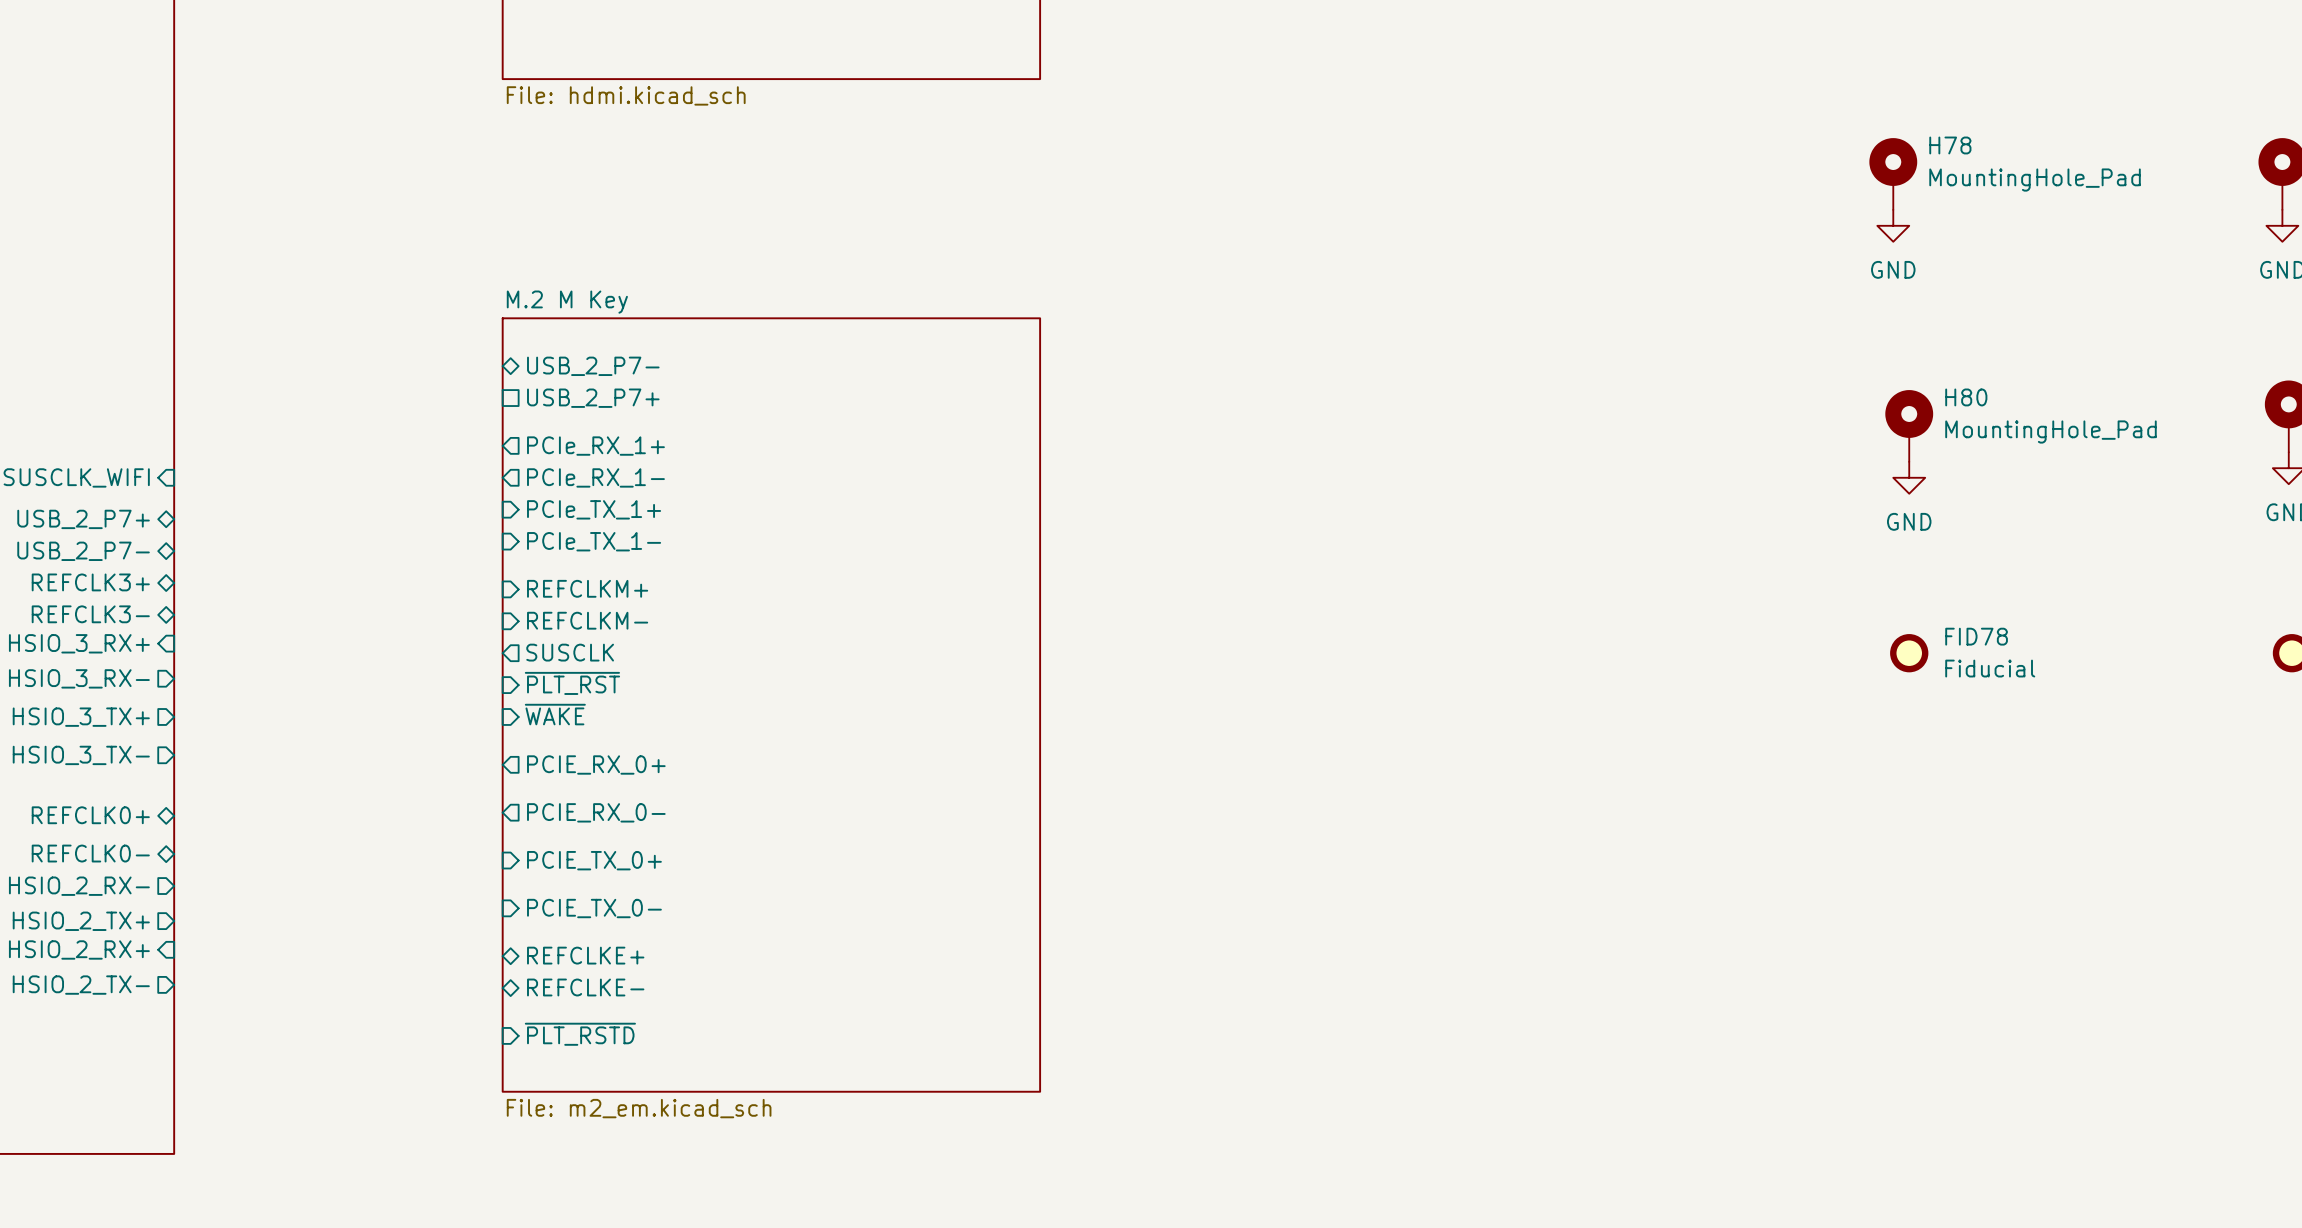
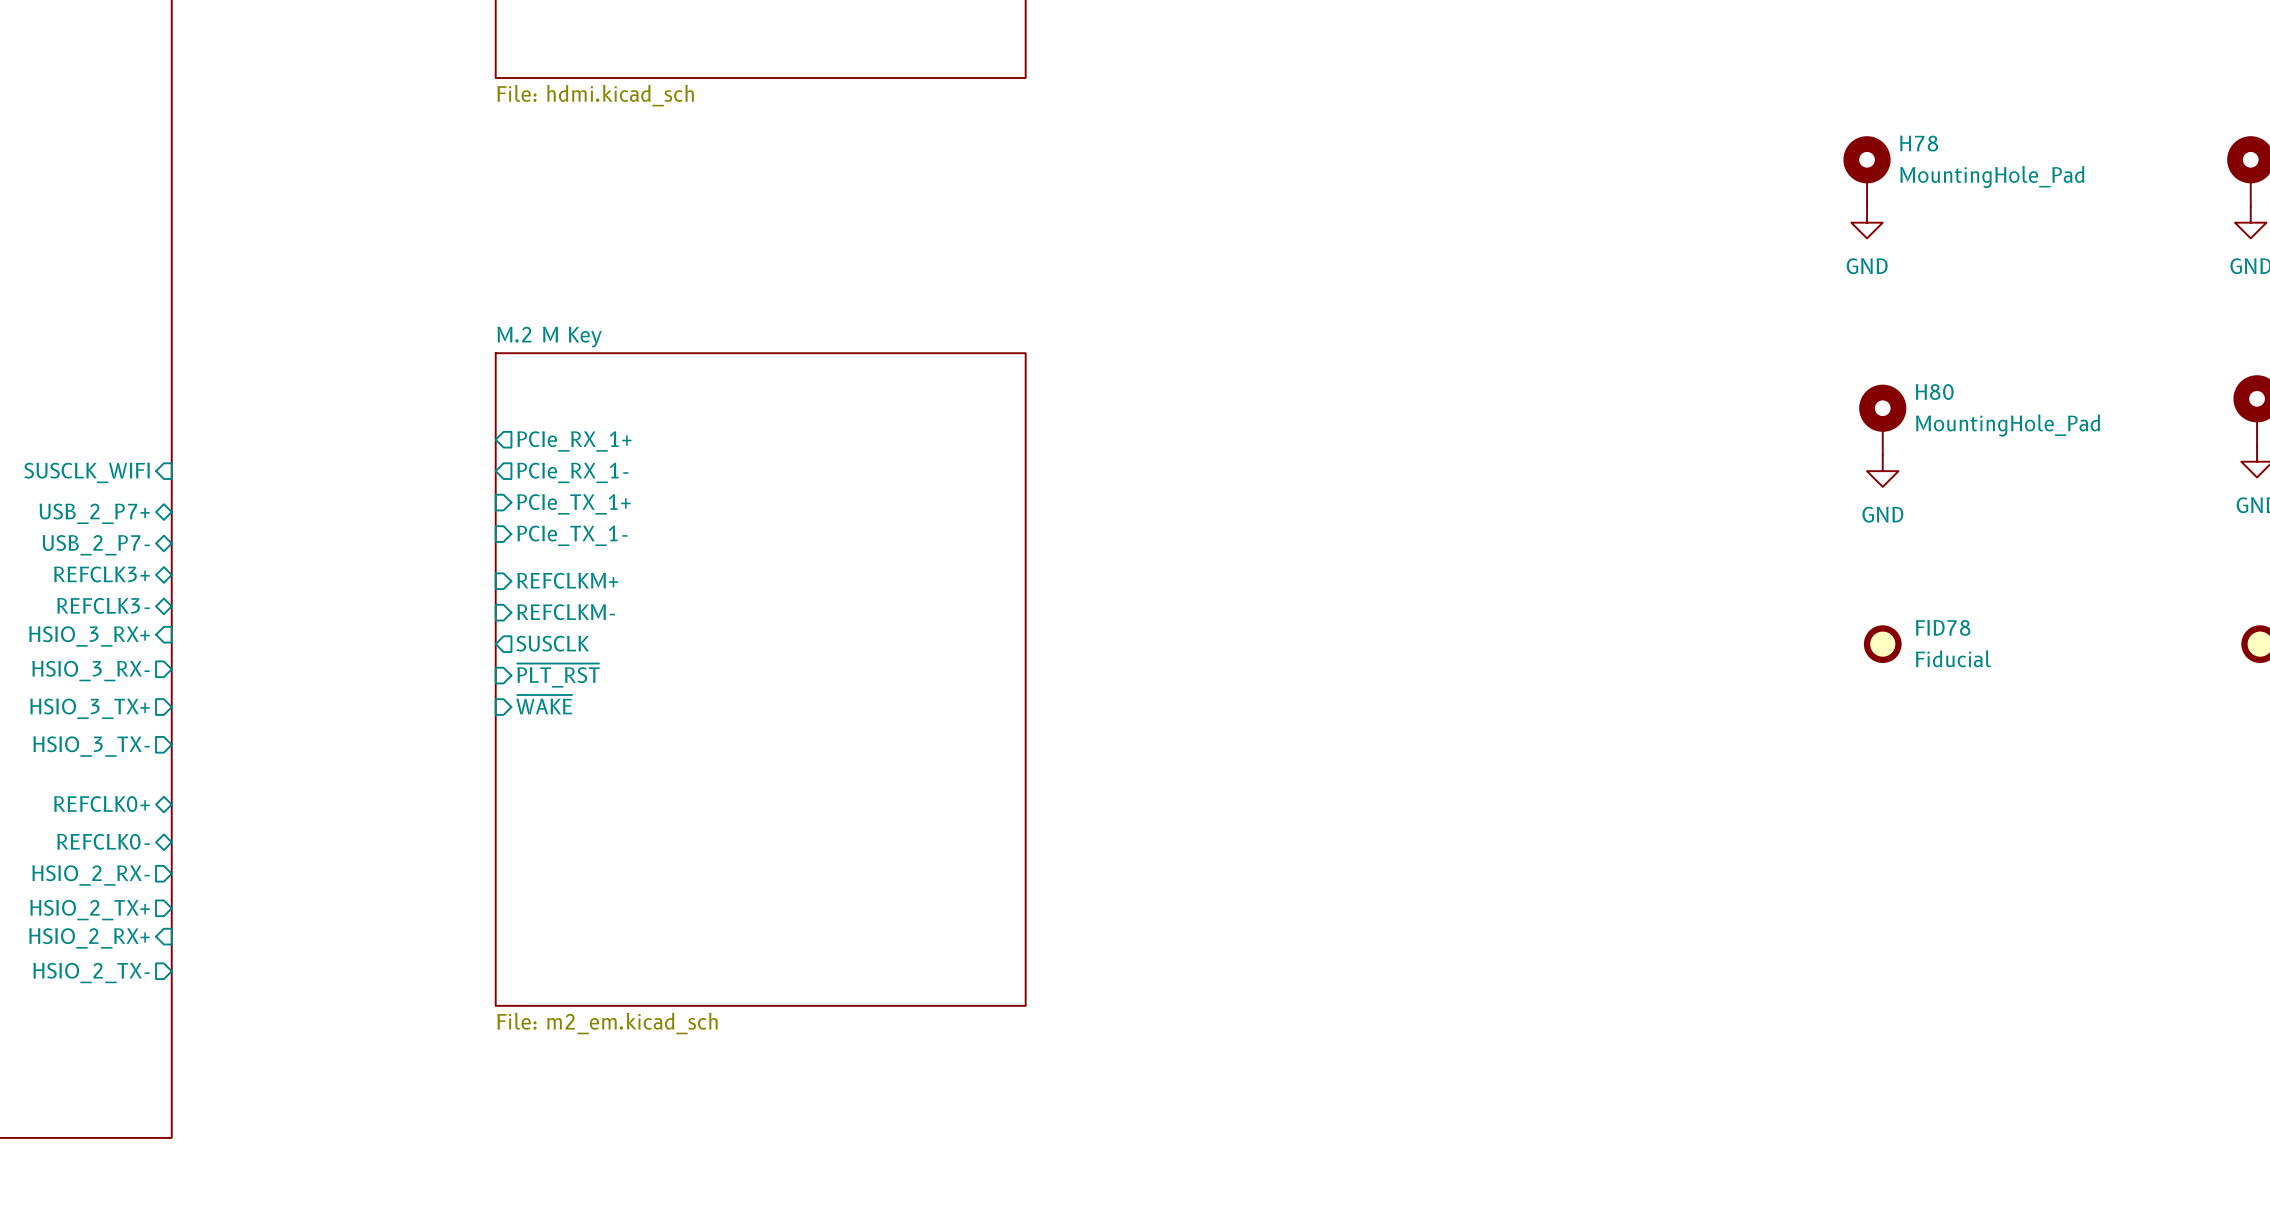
sheet M.2 M Key name position: M.2 M Key (567, 302) -> M.2 M Key (549, 337)
sheet M.2 M Key shape: [501, 317, 1042, 1093] -> [494, 352, 1027, 1007]
sheet pin: USB_2_P7- (593, 366) -> none
sheet pin: USB_2_P7+ (593, 398) -> none
sheet pin: PCIE_RX_0+ (596, 764) -> none
sheet pin: PCIE_RX_0- (596, 812) -> none
sheet pin: PCIE_TX_0+ (594, 860) -> none
sheet pin: PCIE_TX_0- (594, 908) -> none
sheet pin: REFCLKE+ (585, 955) -> none
sheet pin: REFCLKE- (585, 987) -> none
sheet pin: ~{PLT_RSTD} (580, 1034) -> none
sheet M.2 M Key value position: File: m2_em.kicad_sch (639, 1108) -> File: m2_em.kicad_sch (607, 1023)

